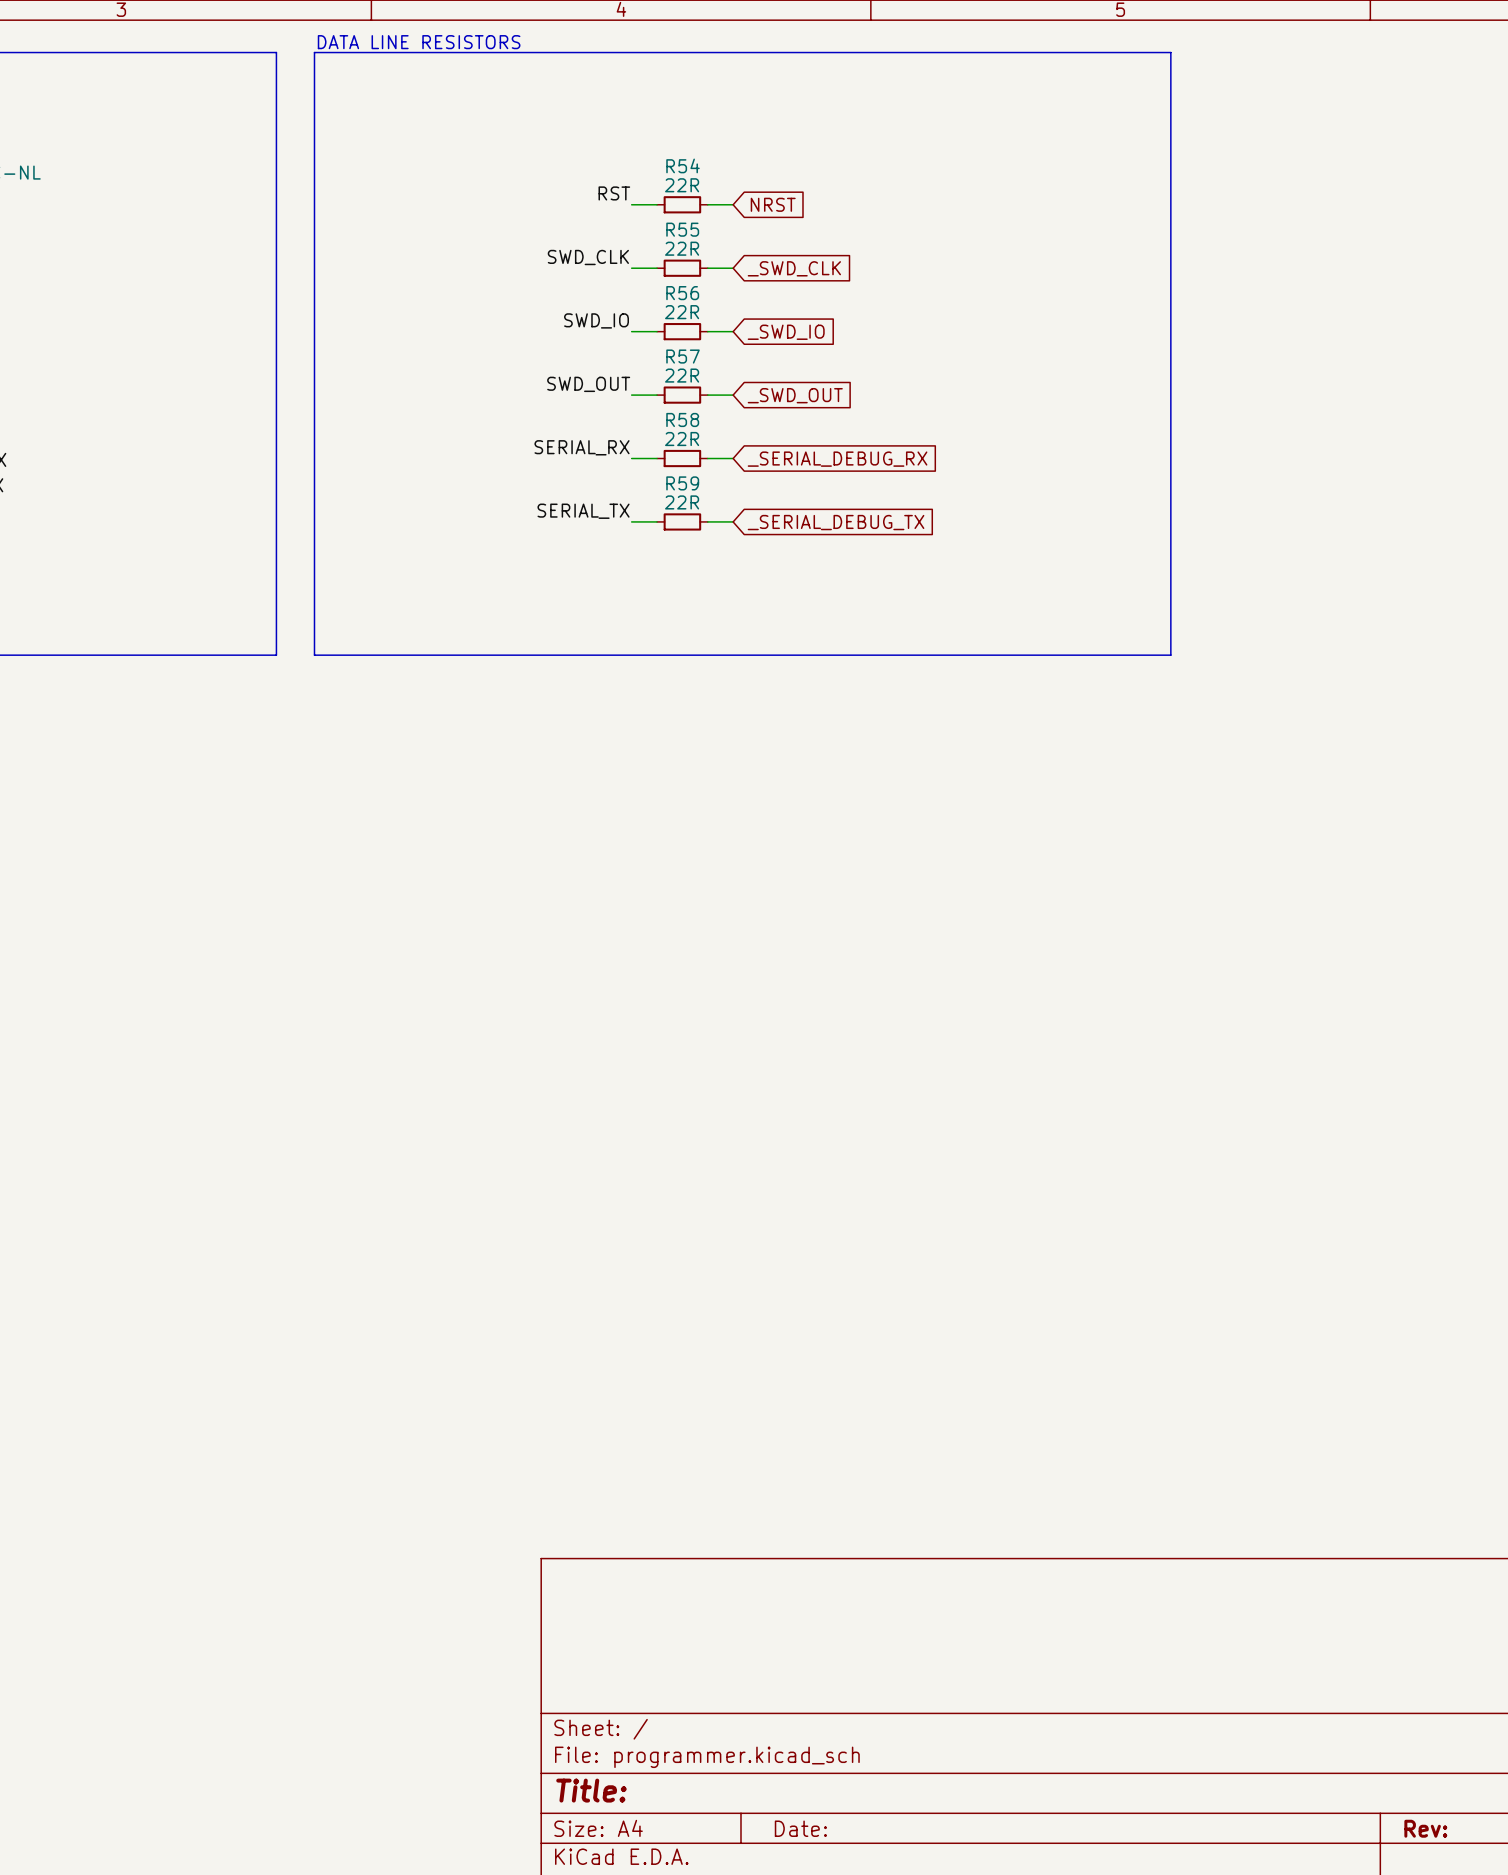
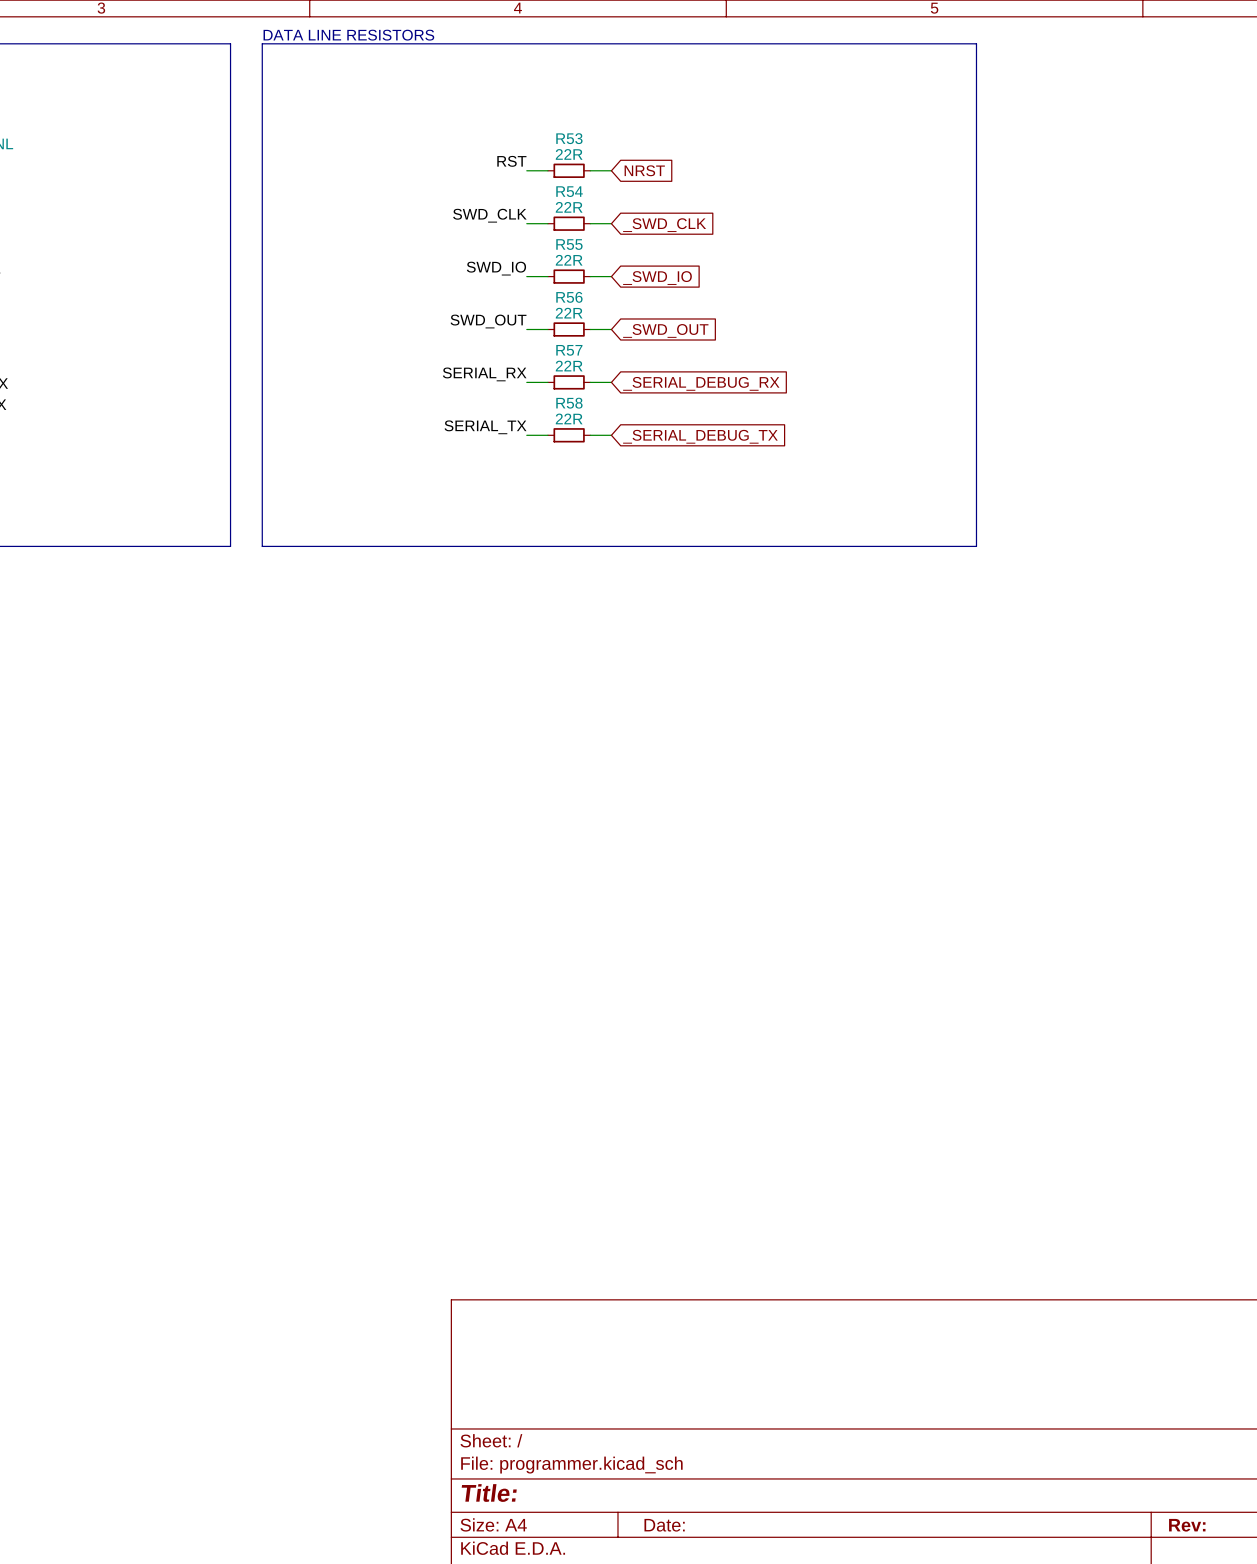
R54 name: R54 (683, 165) -> R53 (569, 138)
R55 name: R55 (682, 229) -> R54 (569, 191)
R56 name: R56 (682, 293) -> R55 (569, 244)
R57 name: R57 (683, 356) -> R56 (569, 297)
R58 name: R58 (682, 419) -> R57 (569, 350)
R59 name: R59 (682, 483) -> R58 (569, 403)

